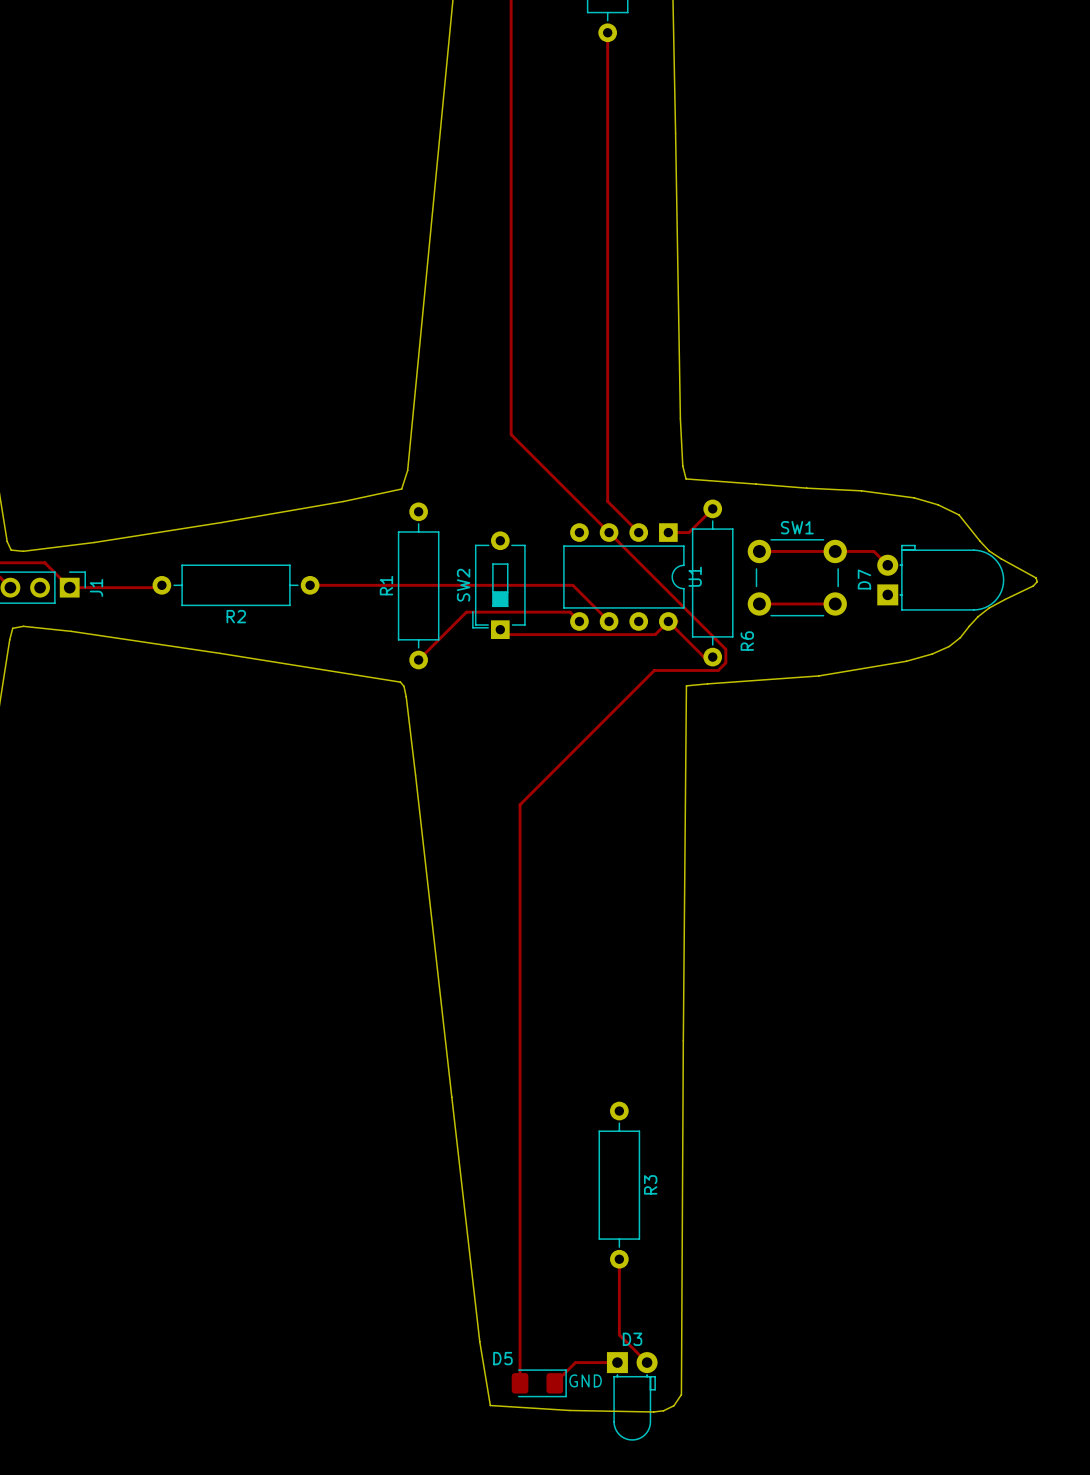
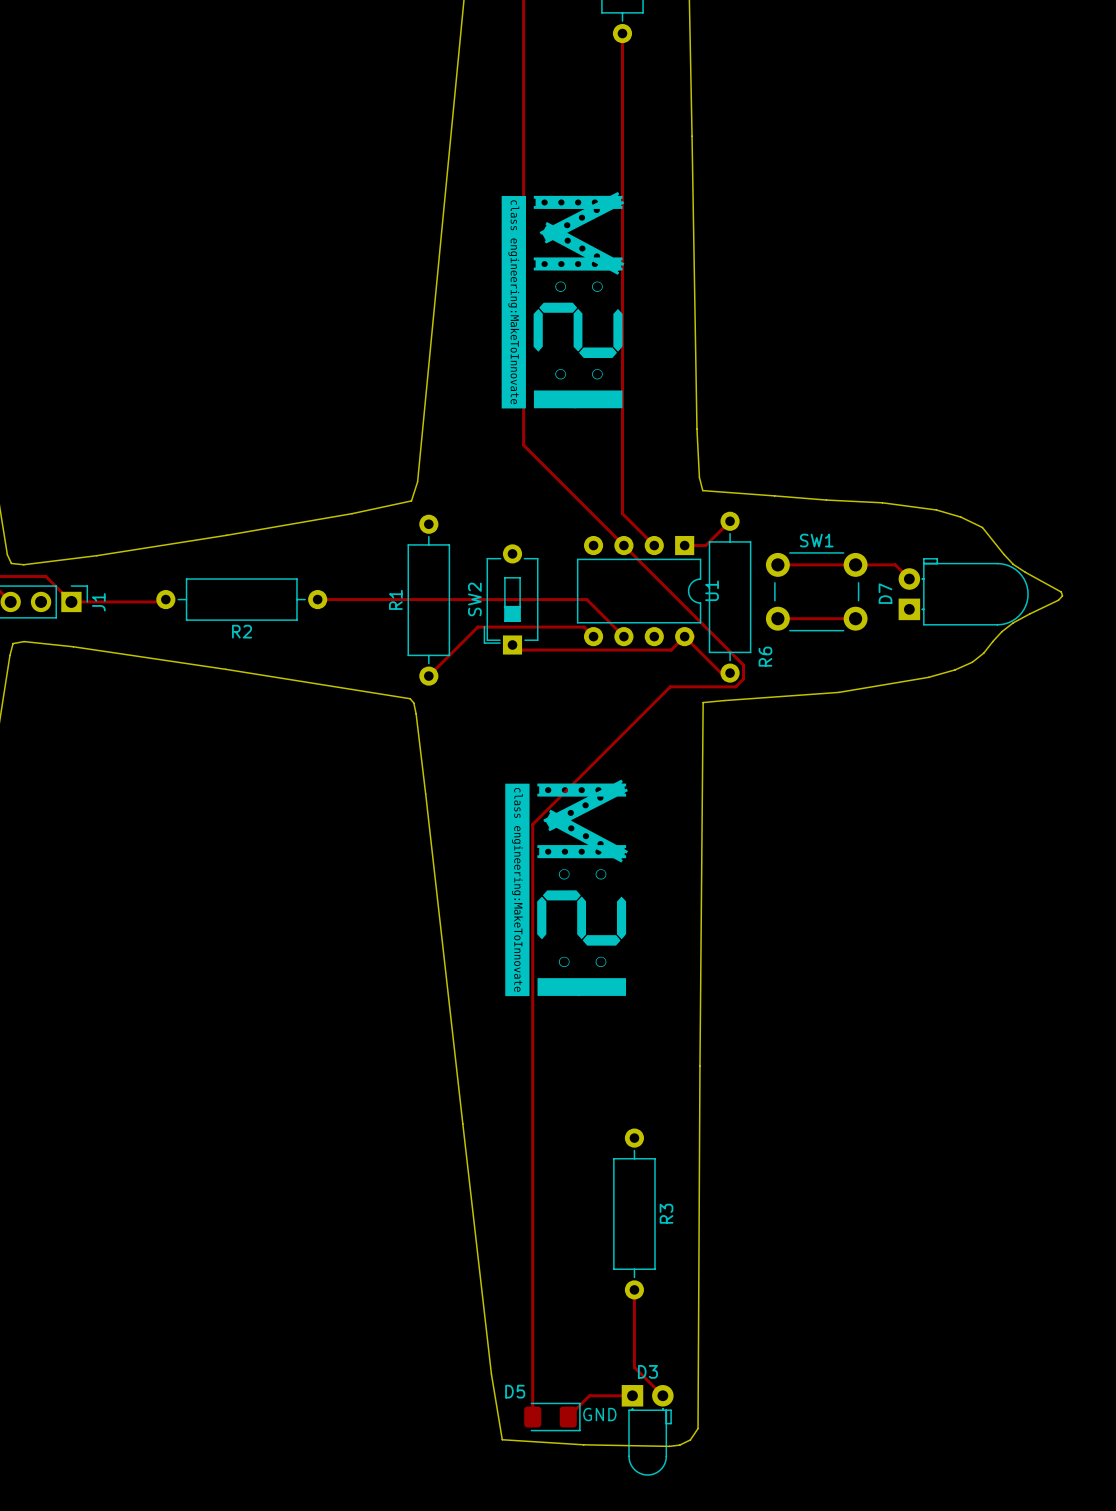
drawing: none -> [501, 192, 625, 409]
drawing: none -> [505, 779, 628, 997]

